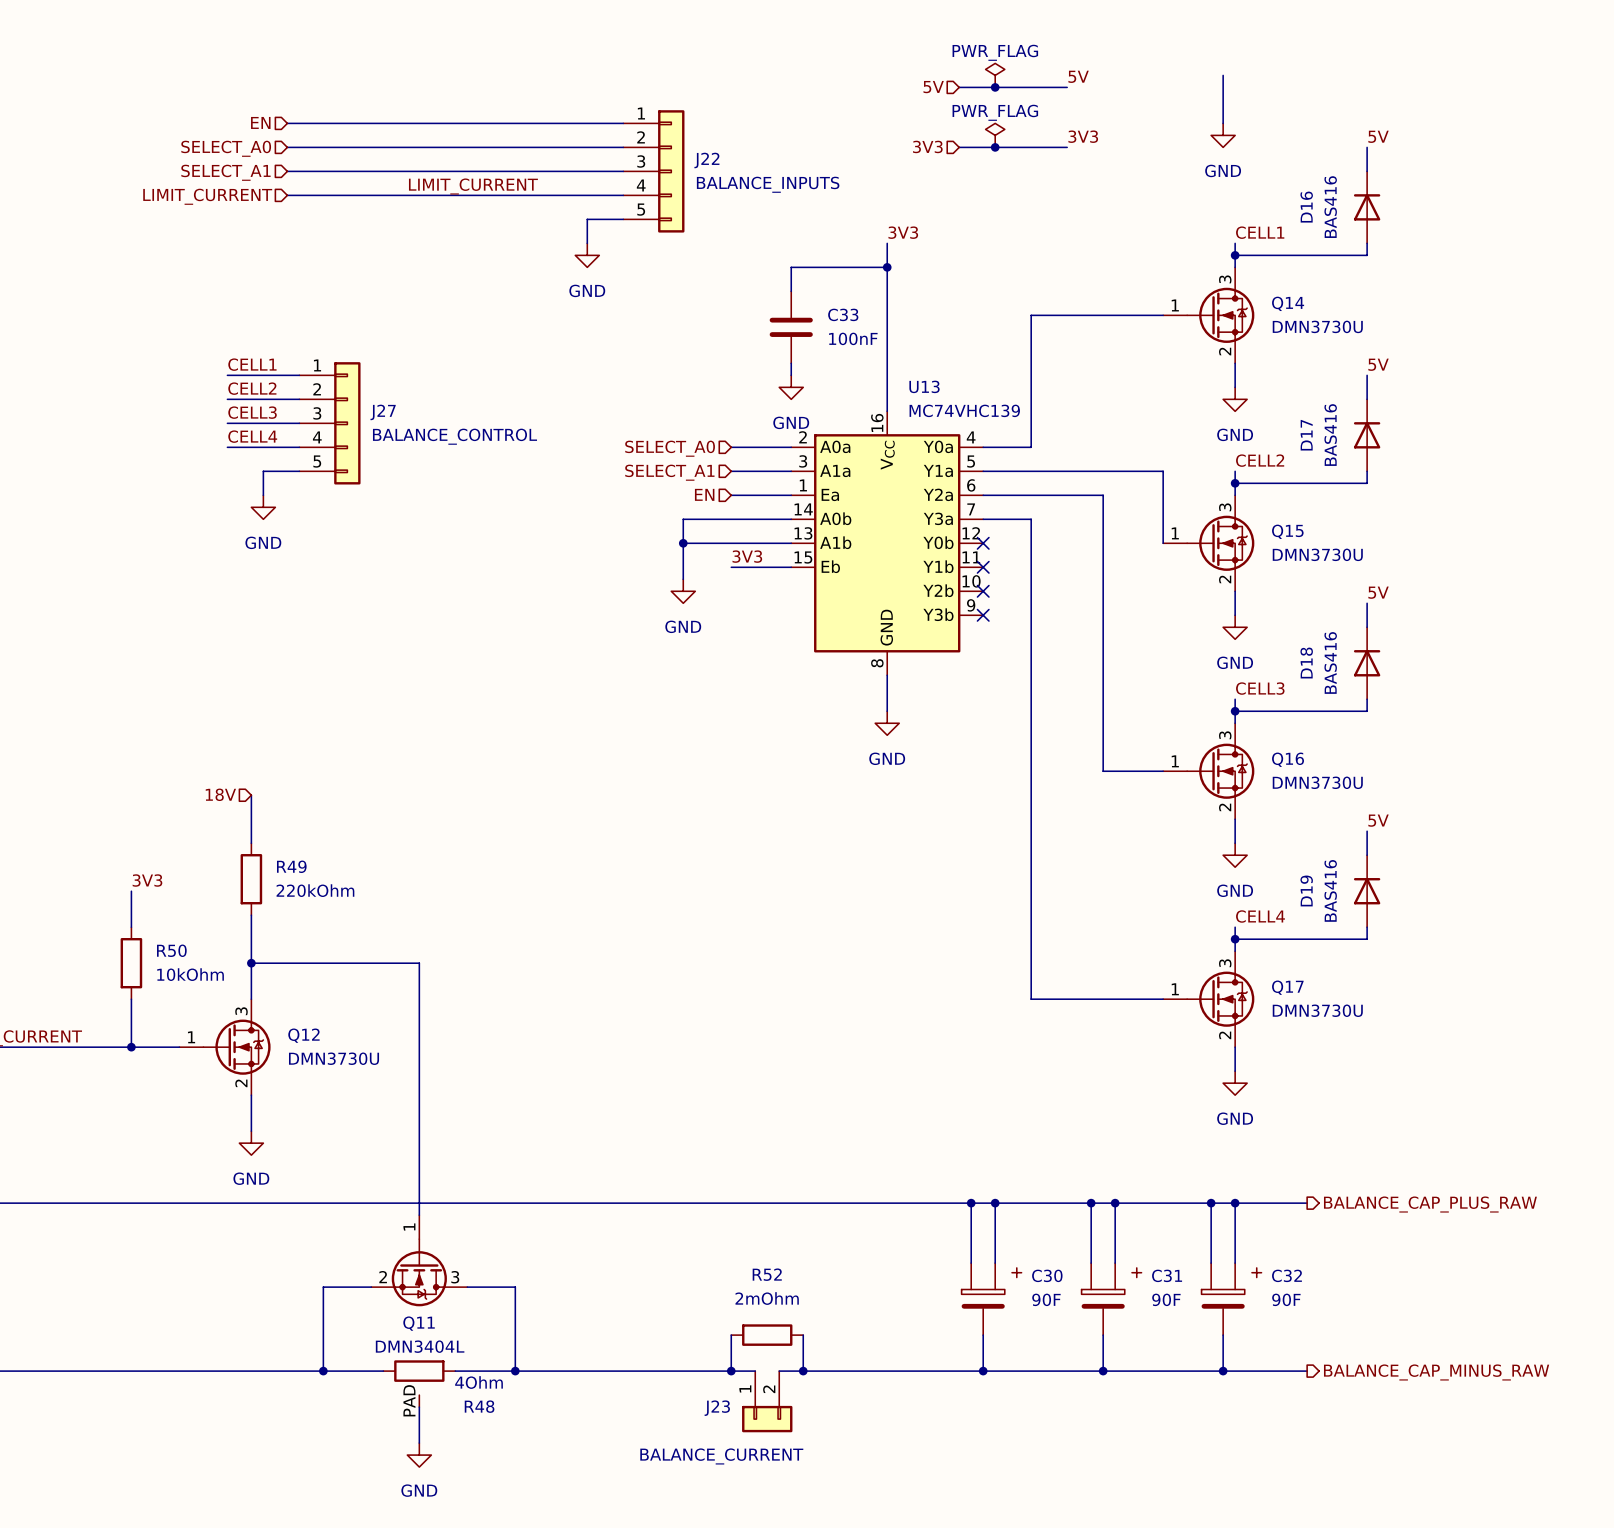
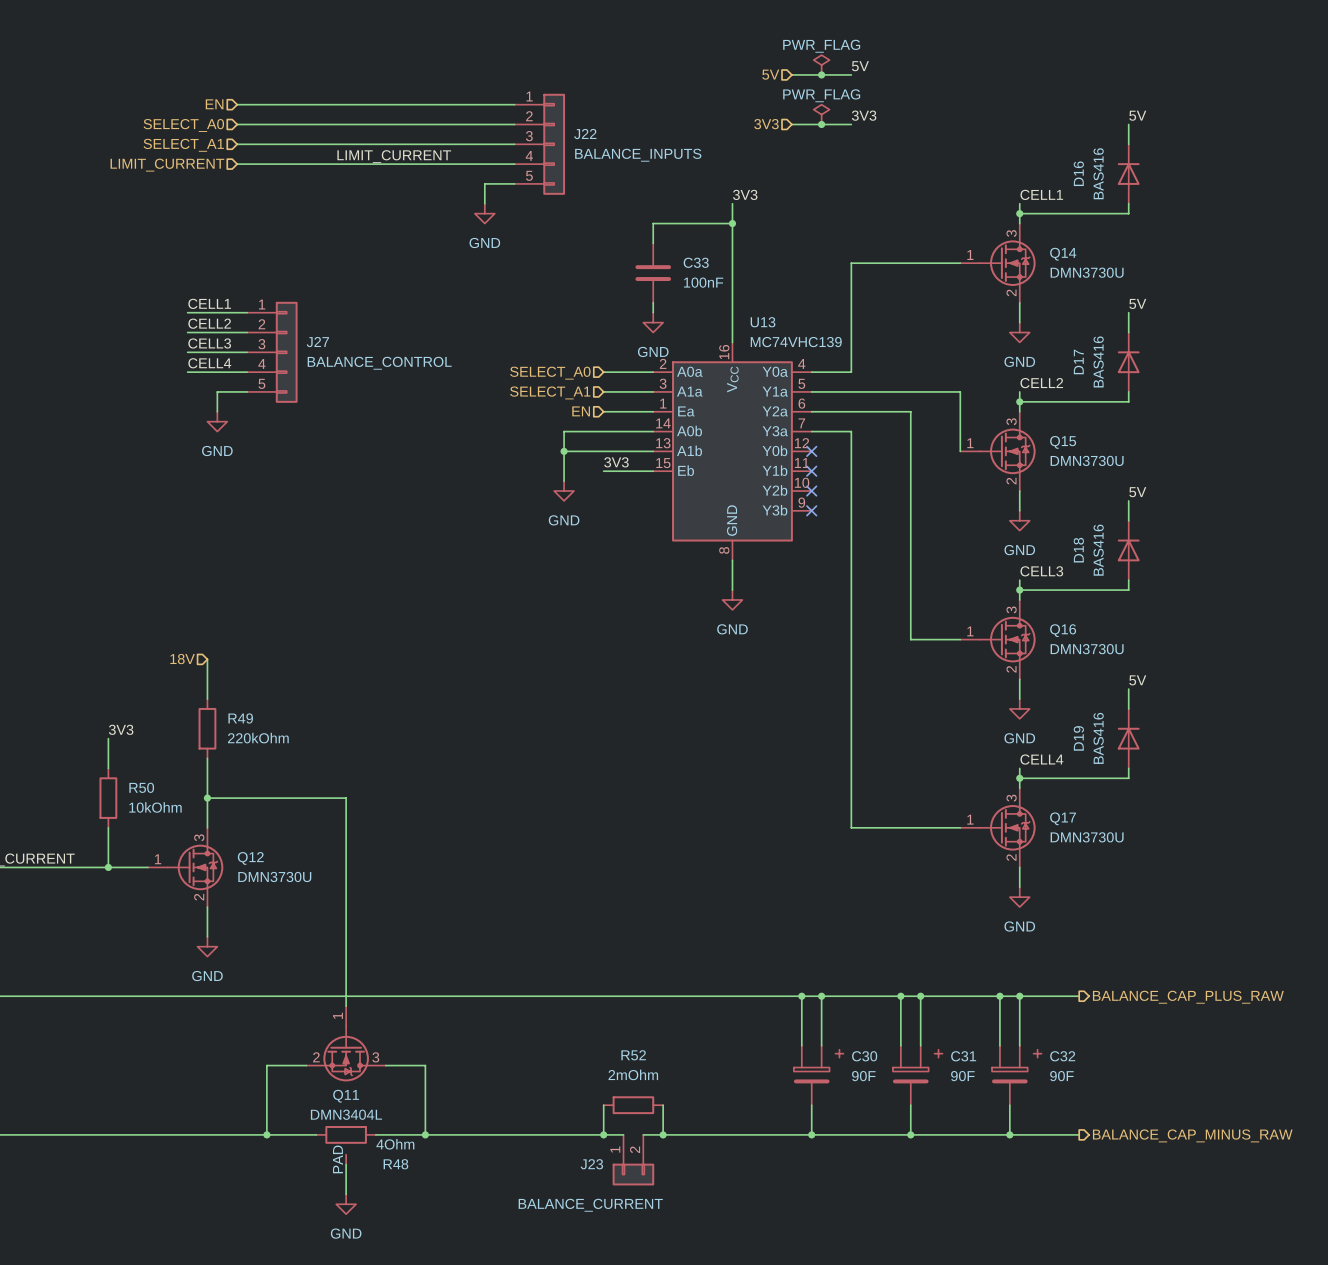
wire: (1223, 75) (1223, 123) -> none
label position: 5V (1078, 76) -> 5V (860, 66)
wire: (1031, 87) (1067, 87) -> none
power symbol: GND (1223, 135) -> none
label position: 3V3 (1083, 136) -> 3V3 (864, 115)
wire: (1031, 147) (1067, 147) -> none

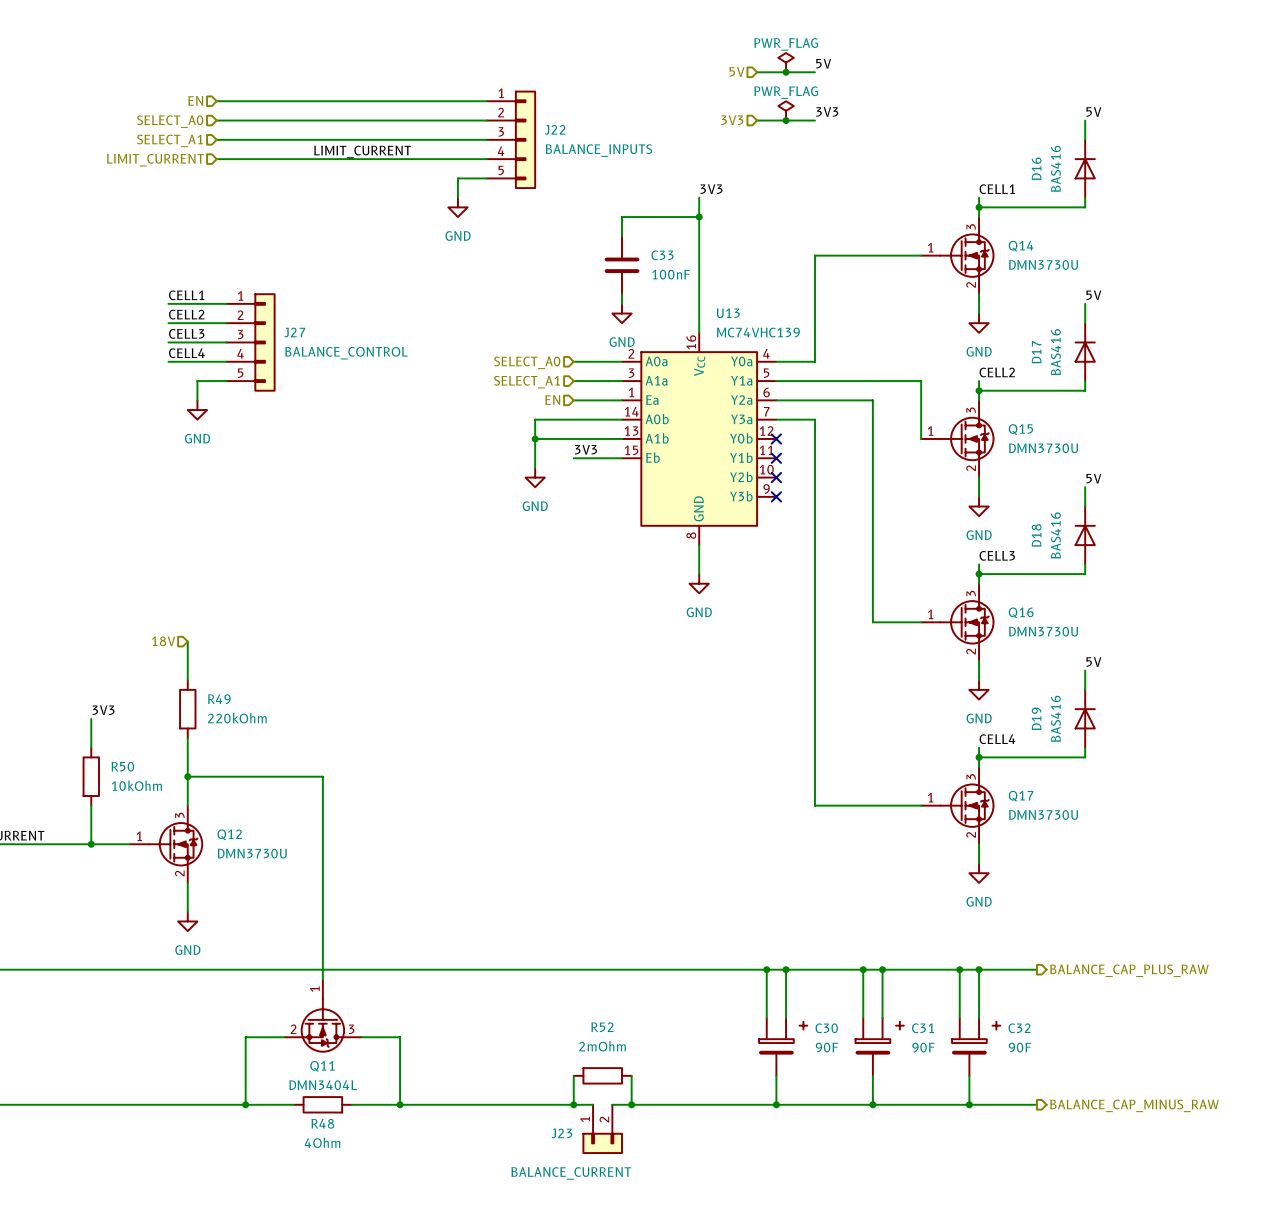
R48 symbol: [316, 1125, 376, 1165] -> [293, 1096, 352, 1114]
R48 value position: 4Ohm (395, 1144) -> 4Ohm (322, 1142)
wire: (346, 1164) (346, 1194) -> none
R48 name position: R48 (395, 1164) -> R48 (322, 1123)
power symbol: GND (346, 1204) -> none

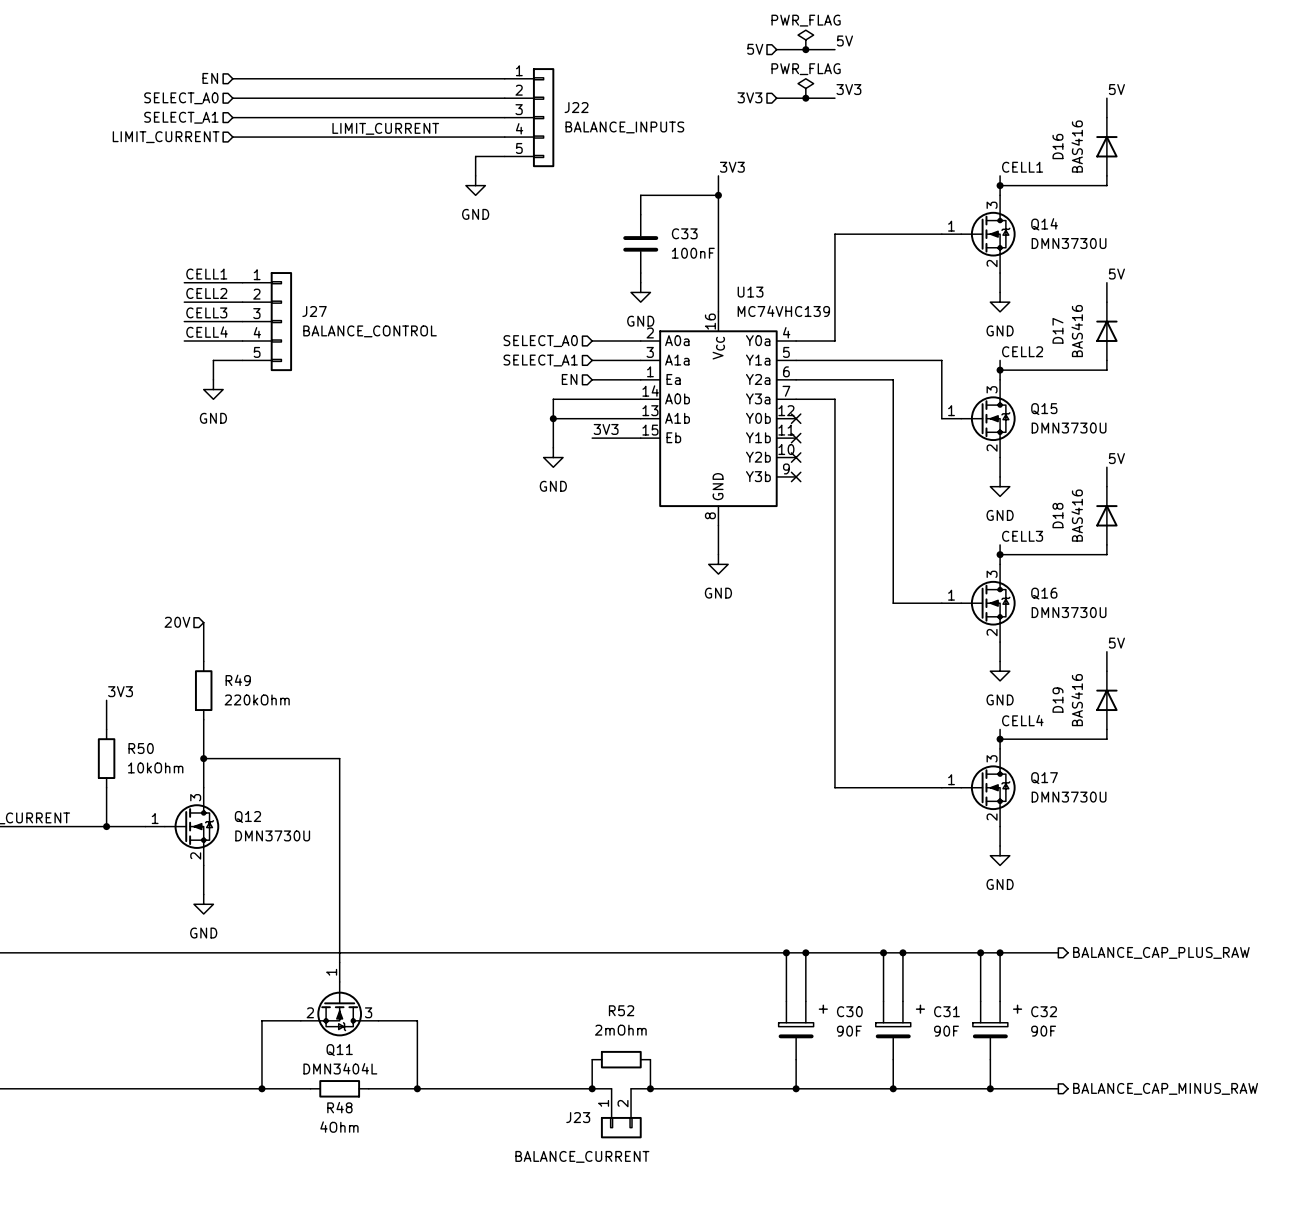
hierarchical label: 18V (163, 641) -> 20V (177, 622)

